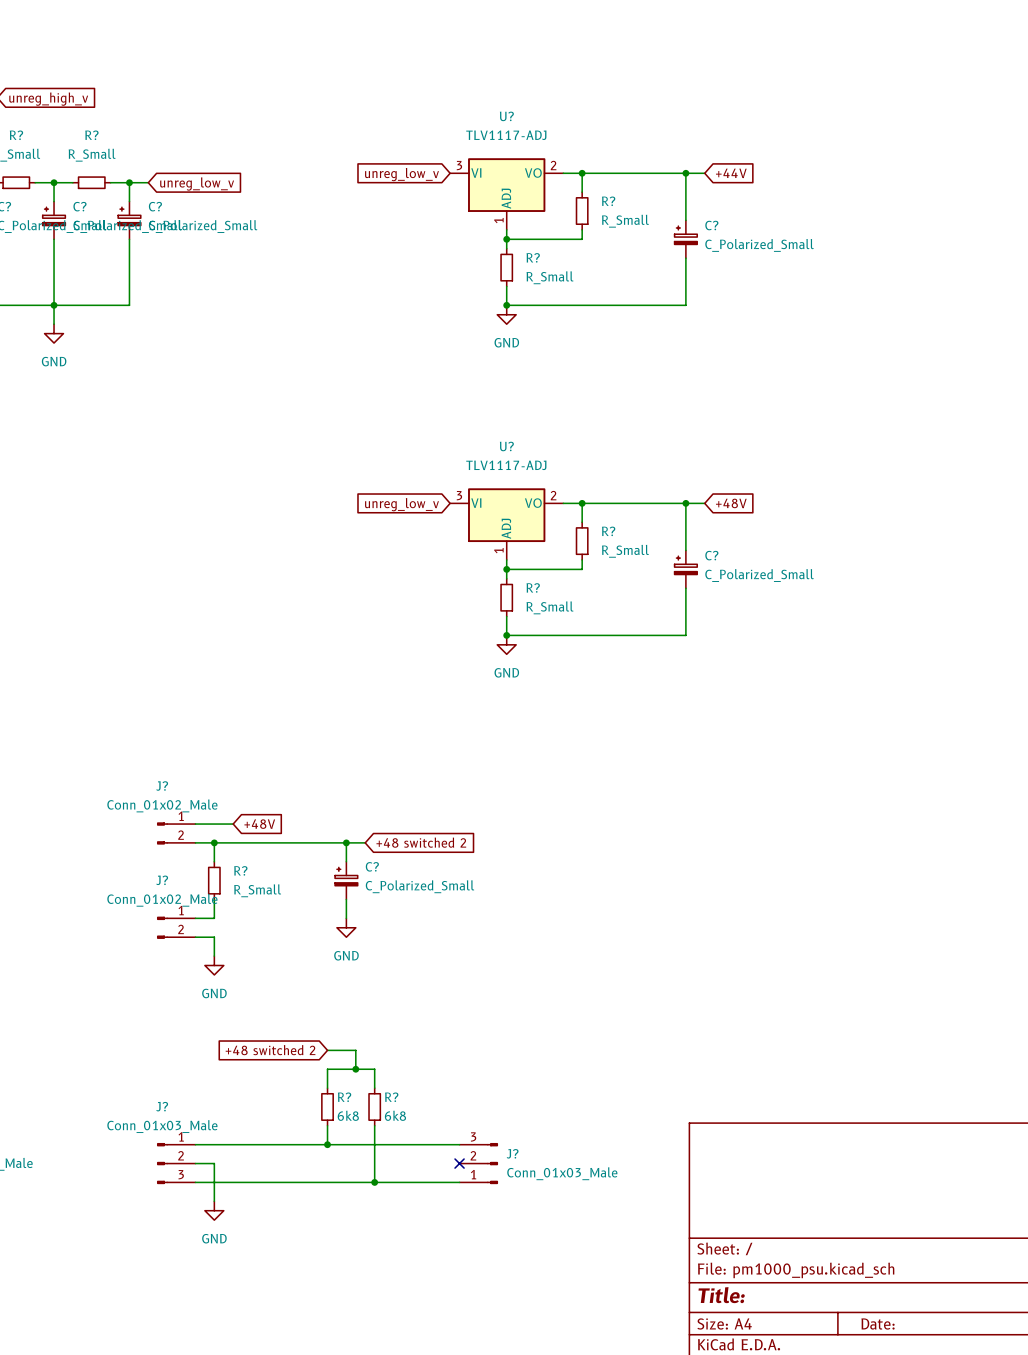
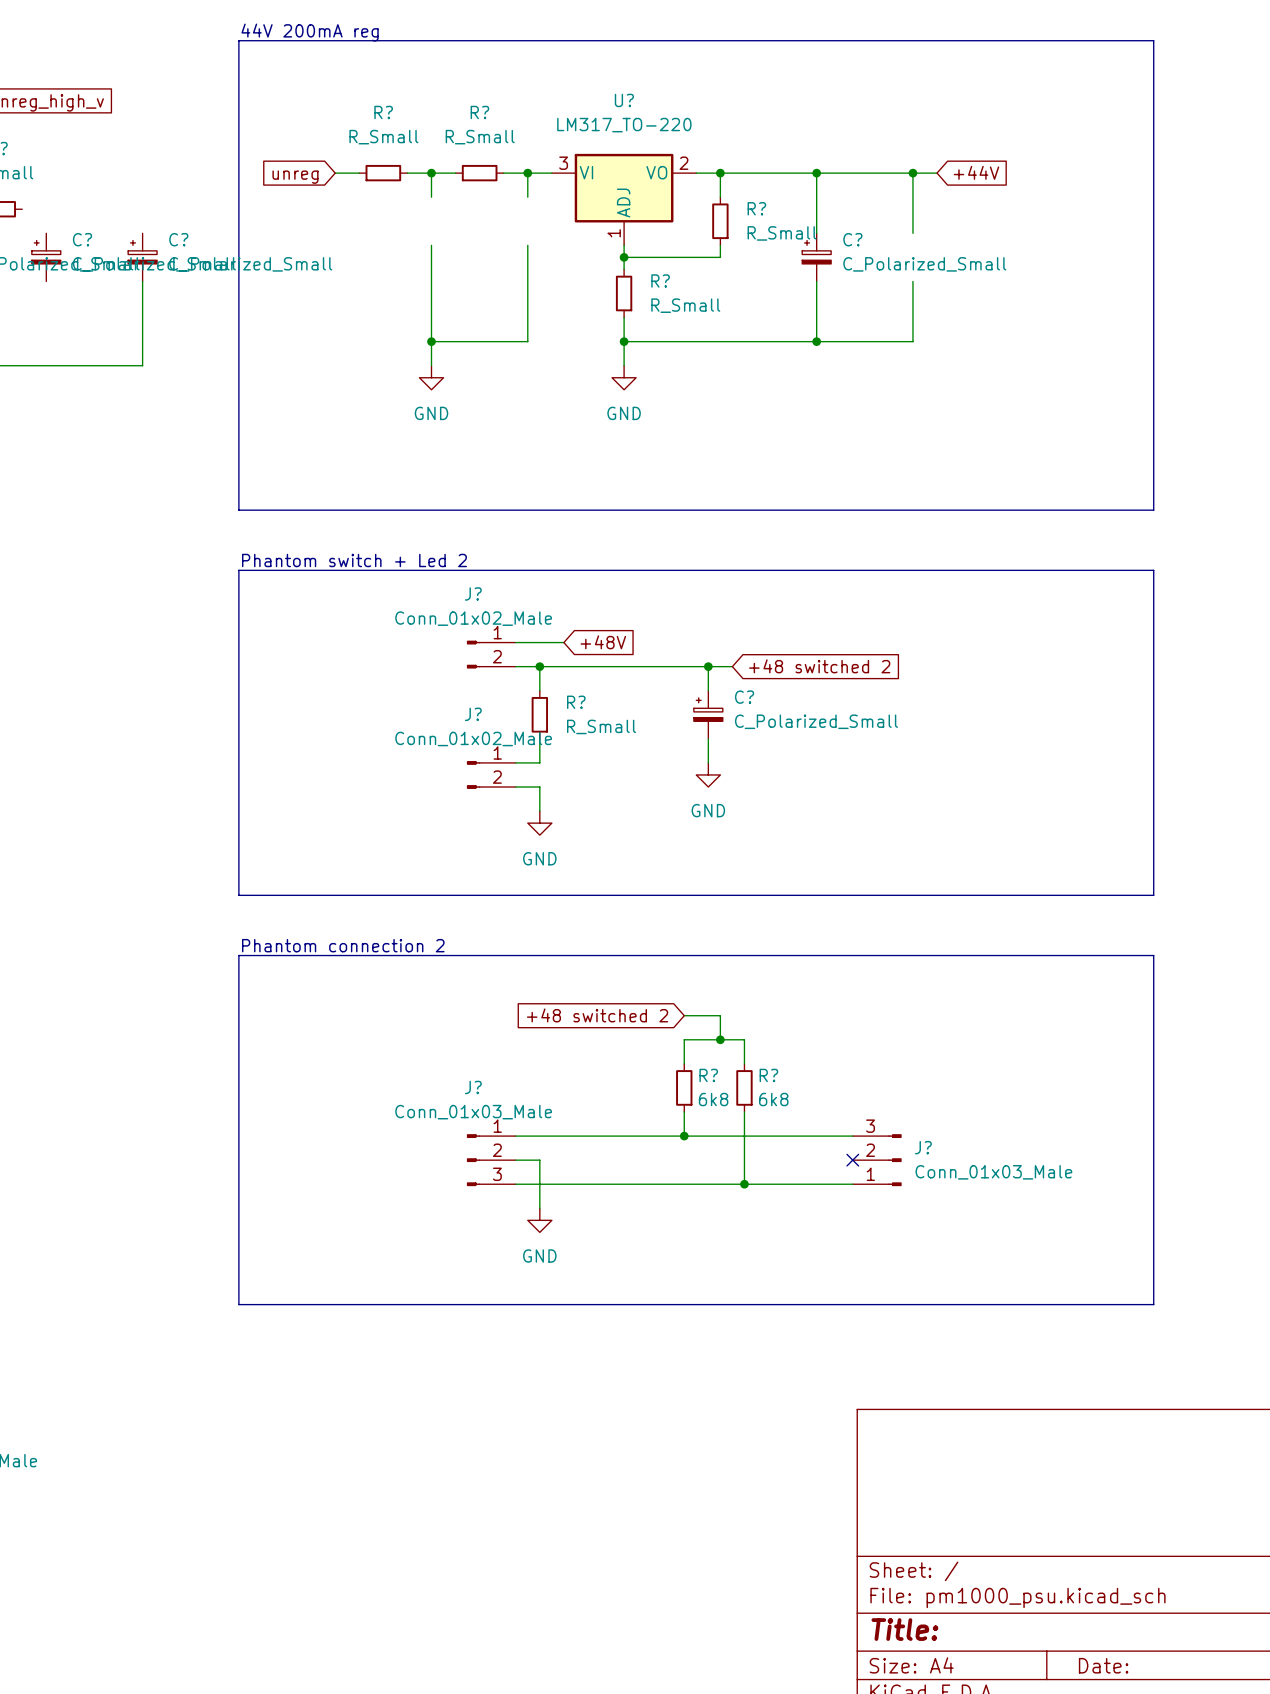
text: none -> 44V 200mA reg (310, 32)
line: none -> (238, 40) (238, 510) (1153, 510) (1153, 40) (238, 40)
wire: none -> (335, 173) (359, 173)
R?: none -> R_Small (383, 173)
wire: none -> (407, 173) (455, 173)
wire: none -> (431, 173) (431, 197)
junction: none -> (431, 173)
R?: none -> R_Small (479, 173)
wire: none -> (503, 173) (551, 173)
wire: none -> (527, 173) (527, 197)
junction: none -> (527, 173)
wire: none -> (696, 173) (937, 173)
junction: none -> (816, 173)
wire: none -> (912, 173) (912, 233)
junction: none -> (912, 173)
global label: none -> unreg (295, 177)
wire: (563, 173) (704, 173) -> none
wire: (582, 173) (582, 192) -> (720, 197) (720, 173)
junction position: (582, 173) -> (720, 173)
wire: (685, 173) (685, 220) -> (816, 173) (816, 233)
junction: (685, 173) -> none
global label position: +44V (731, 173) -> +44V (976, 172)
global label: unreg_low_v (401, 174) -> none
U?: none -> LM317_TO-220 (624, 199)
wire: (35, 182) (72, 182) -> none
wire: (54, 182) (54, 201) -> none
junction: (54, 182) -> none
R?: R_Small (91, 182) -> none
wire: (110, 182) (148, 182) -> none
wire: (129, 182) (129, 201) -> none
junction: (129, 182) -> none
global label: unreg_low_v (197, 184) -> none
U?: TLV1117-ADJ (506, 194) -> none
wire: none -> (431, 245) (431, 365)
wire: none -> (527, 245) (527, 341) (431, 341)
R? position: (582, 211) -> (720, 221)
wire: (582, 229) (582, 239) (506, 239) -> (720, 245) (720, 257) (624, 257)
wire: (54, 239) (54, 324) -> none
junction position: (506, 239) -> (624, 257)
wire: none -> (816, 281) (816, 341)
C? position: (685, 239) -> (816, 257)
wire: none -> (912, 281) (912, 341) (624, 341) (624, 317)
wire: (685, 258) (685, 305) (506, 305) -> none
R? position: (506, 267) -> (624, 293)
junction: none -> (431, 341)
junction: none -> (816, 341)
junction: (54, 305) -> none
junction position: (506, 305) -> (624, 341)
power symbol: none -> GND (431, 377)
power symbol: GND (54, 333) -> none
text: none -> Phantom switch + Led 2 (354, 560)
line: none -> (238, 570) (238, 895) (1153, 895) (1153, 570) (238, 570)
wire: (563, 503) (704, 503) -> none
wire: (582, 503) (582, 522) -> (708, 666) (708, 690)
junction: (582, 503) -> none
wire: (685, 503) (685, 550) -> none
junction: (685, 503) -> none
global label: +48V (731, 503) -> none
global label: unreg_low_v (401, 504) -> none
wire: none -> (515, 642) (563, 642)
global label: none -> +48V (603, 642)
U?: TLV1117-ADJ (506, 524) -> none
J?: none -> Conn_01x02_Male (491, 654)
global label: none -> +48 switched 2 (819, 666)
wire: none -> (515, 666) (732, 666)
junction: none -> (539, 666)
junction: none -> (708, 666)
R?: R_Small (582, 541) -> none
wire: (506, 559) (506, 578) -> (539, 666) (539, 690)
wire: (582, 559) (582, 569) (506, 569) -> none
junction: (506, 569) -> none
C? position: (685, 569) -> (708, 714)
wire: (685, 588) (685, 635) (506, 635) (506, 616) -> none
wire: none -> (539, 738) (539, 762) (515, 762)
R? position: (506, 597) -> (539, 714)
wire: none -> (708, 738) (708, 762)
J?: none -> Conn_01x02_Male (491, 774)
power symbol: none -> GND (708, 774)
wire: none -> (515, 787) (539, 787) (539, 811)
junction: (506, 635) -> none
power symbol: GND (506, 644) -> none
power symbol: none -> GND (539, 823)
text: none -> Phantom connection 2 (343, 945)
line: none -> (238, 955) (238, 1304) (1153, 1304) (1153, 955) (238, 955)
global label: none -> +48 switched 2 (597, 1015)
wire: none -> (684, 1015) (720, 1015) (720, 1039)
wire: (195, 824) (233, 824) -> none
global label: +48V (259, 824) -> none
J?: Conn_01x02_Male (176, 833) -> none
junction: none -> (720, 1039)
wire: (195, 842) (365, 842) -> none
wire: (214, 842) (214, 861) -> none
junction: (214, 842) -> none
wire: (346, 842) (346, 861) -> none
junction: (346, 842) -> none
global label: +48 switched 2 (421, 842) -> none
wire: none -> (684, 1063) (684, 1039) (744, 1039) (744, 1063)
R?: none -> 6k8 (684, 1087)
R?: none -> 6k8 (744, 1087)
R?: R_Small (214, 880) -> none
C?: C_Polarized_Small (346, 880) -> none
wire: none -> (684, 1112) (684, 1136)
wire: none -> (744, 1112) (744, 1184)
wire: (214, 899) (214, 918) (195, 918) -> none
wire: (346, 899) (346, 918) -> none
wire: none -> (515, 1136) (852, 1136)
junction: none -> (684, 1136)
J?: Conn_01x02_Male (176, 927) -> none
power symbol position: GND (346, 927) -> GND (539, 1220)
J?: none -> Conn_01x03_Male (491, 1160)
wire: none -> (515, 1160) (539, 1160) (539, 1208)
no-connect mark: none -> (852, 1160)
J?: none -> Conn_01x03_Male (877, 1160)
wire: (195, 937) (214, 937) (214, 956) -> none
wire: none -> (515, 1184) (852, 1184)
junction: none -> (744, 1184)
power symbol: GND (214, 965) -> none
global label: +48 switched 2 (270, 1050) -> none
wire: (327, 1050) (355, 1050) (355, 1069) -> none
junction: (355, 1069) -> none
wire: (327, 1088) (327, 1069) (374, 1069) (374, 1088) -> none
R?: 6k8 (327, 1106) -> none
R?: 6k8 (374, 1106) -> none
wire: (327, 1125) (327, 1144) -> none
wire: (374, 1125) (374, 1182) -> none
wire: (195, 1144) (459, 1144) -> none
junction: (327, 1144) -> none
J?: Conn_01x03_Male (176, 1163) -> none
wire: (195, 1163) (214, 1163) (214, 1201) -> none
no-connect mark: (459, 1163) -> none
J?: Conn_01x03_Male (478, 1163) -> none
wire: (195, 1182) (459, 1182) -> none
junction: (374, 1182) -> none
power symbol: GND (214, 1210) -> none

